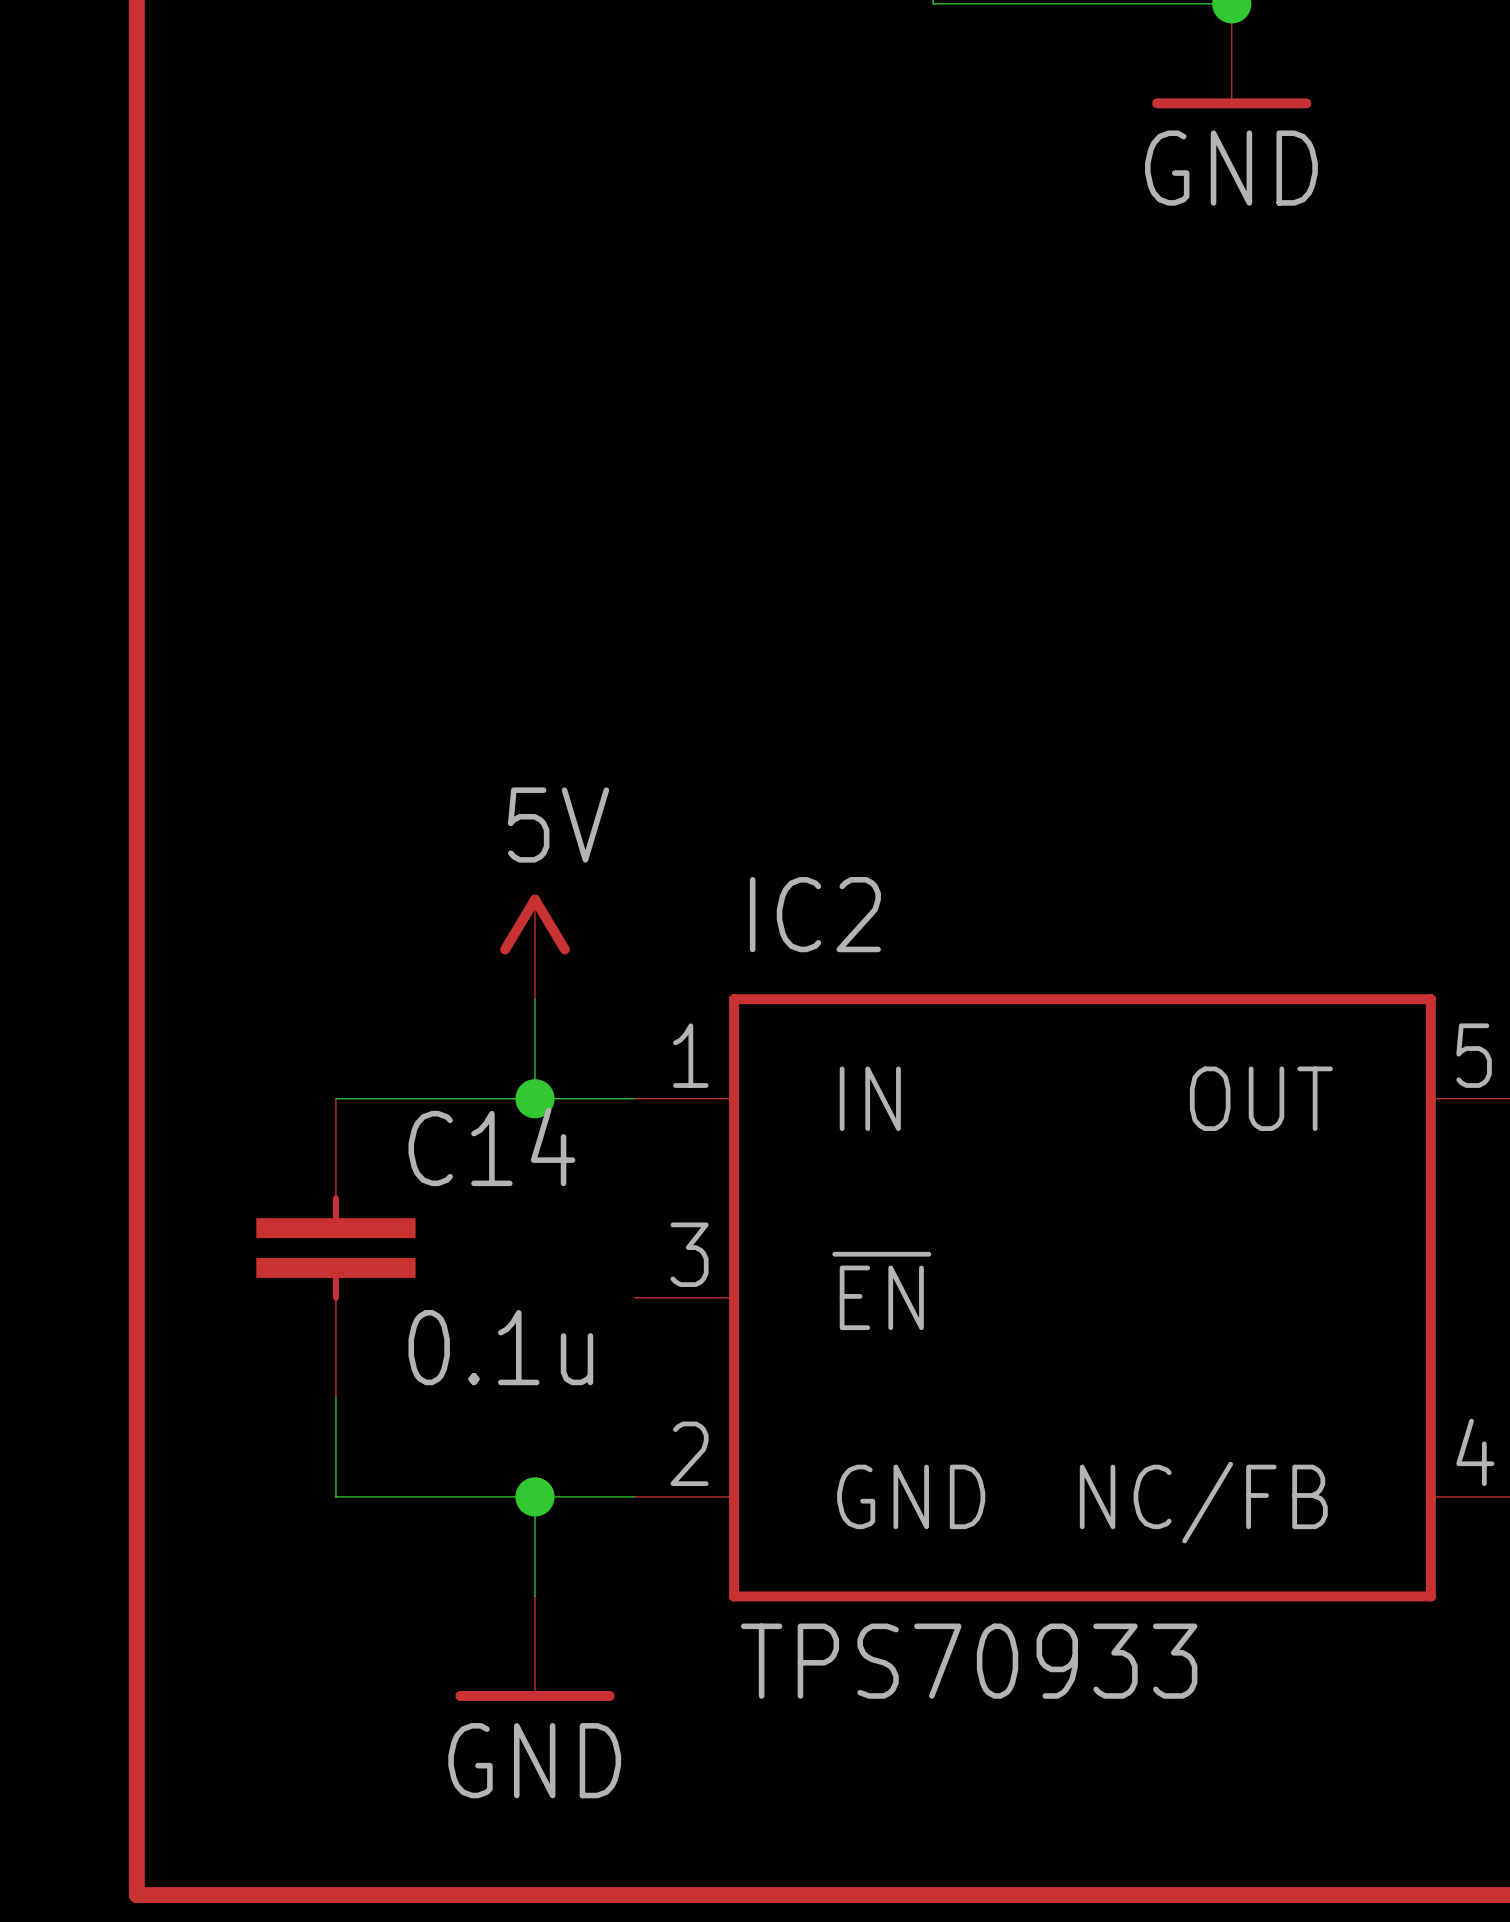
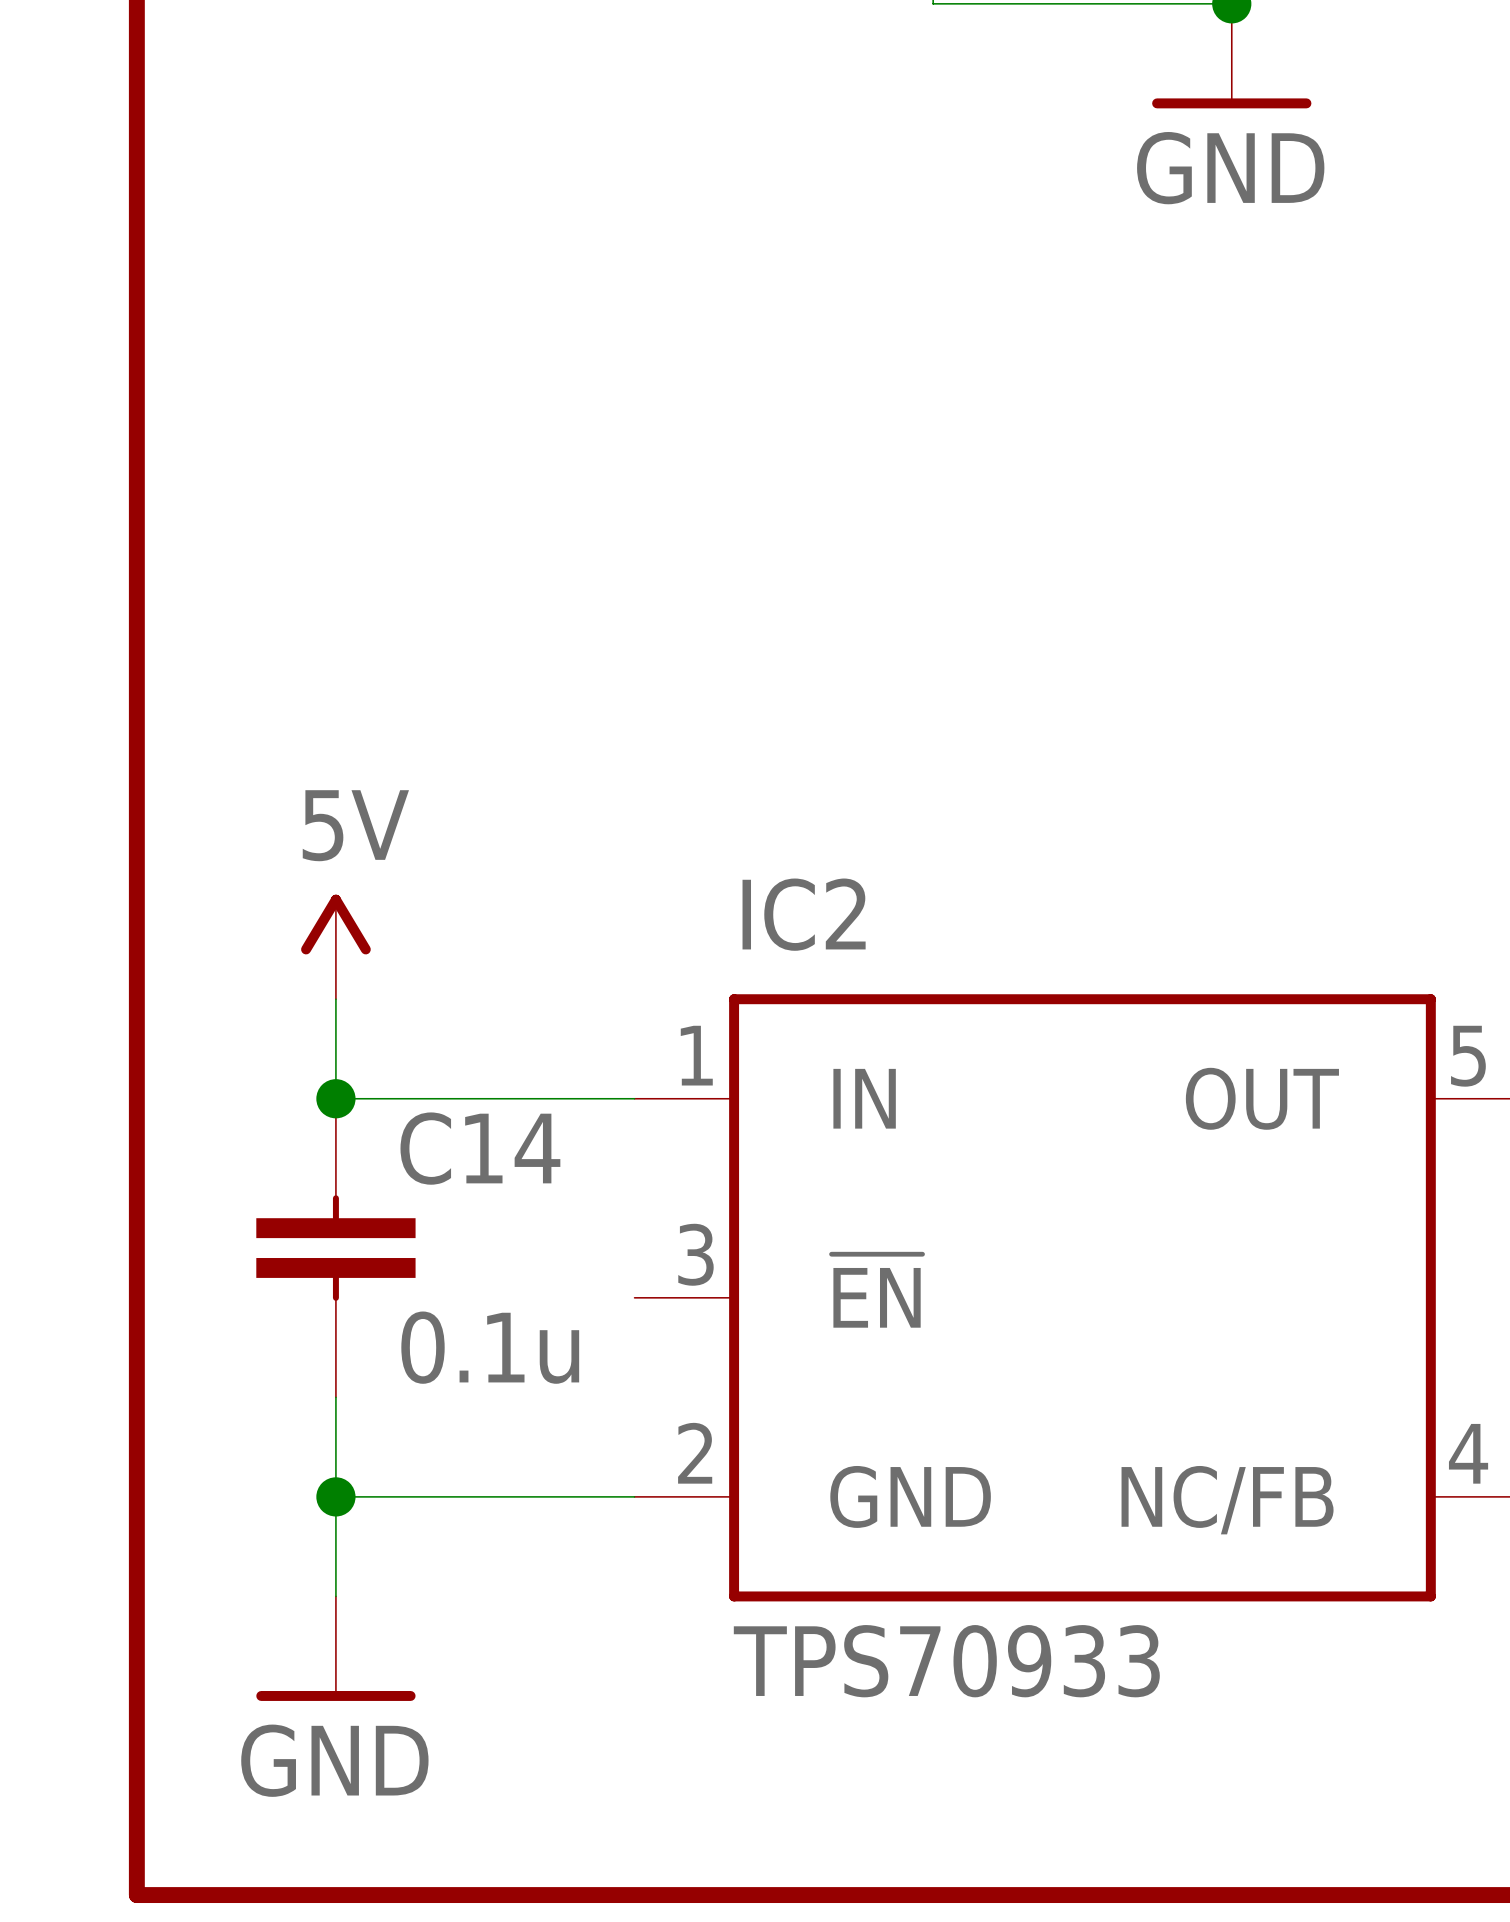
power symbol position: 5V (535, 946) -> 5V (335, 946)
wire: (535, 999) (535, 1098) -> (335, 999) (335, 1098)
junction position: (535, 1098) -> (335, 1098)
wire: (535, 1496) (535, 1596) -> (335, 1496) (335, 1596)
junction position: (535, 1496) -> (335, 1496)
power symbol position: GND (535, 1648) -> GND (335, 1648)

